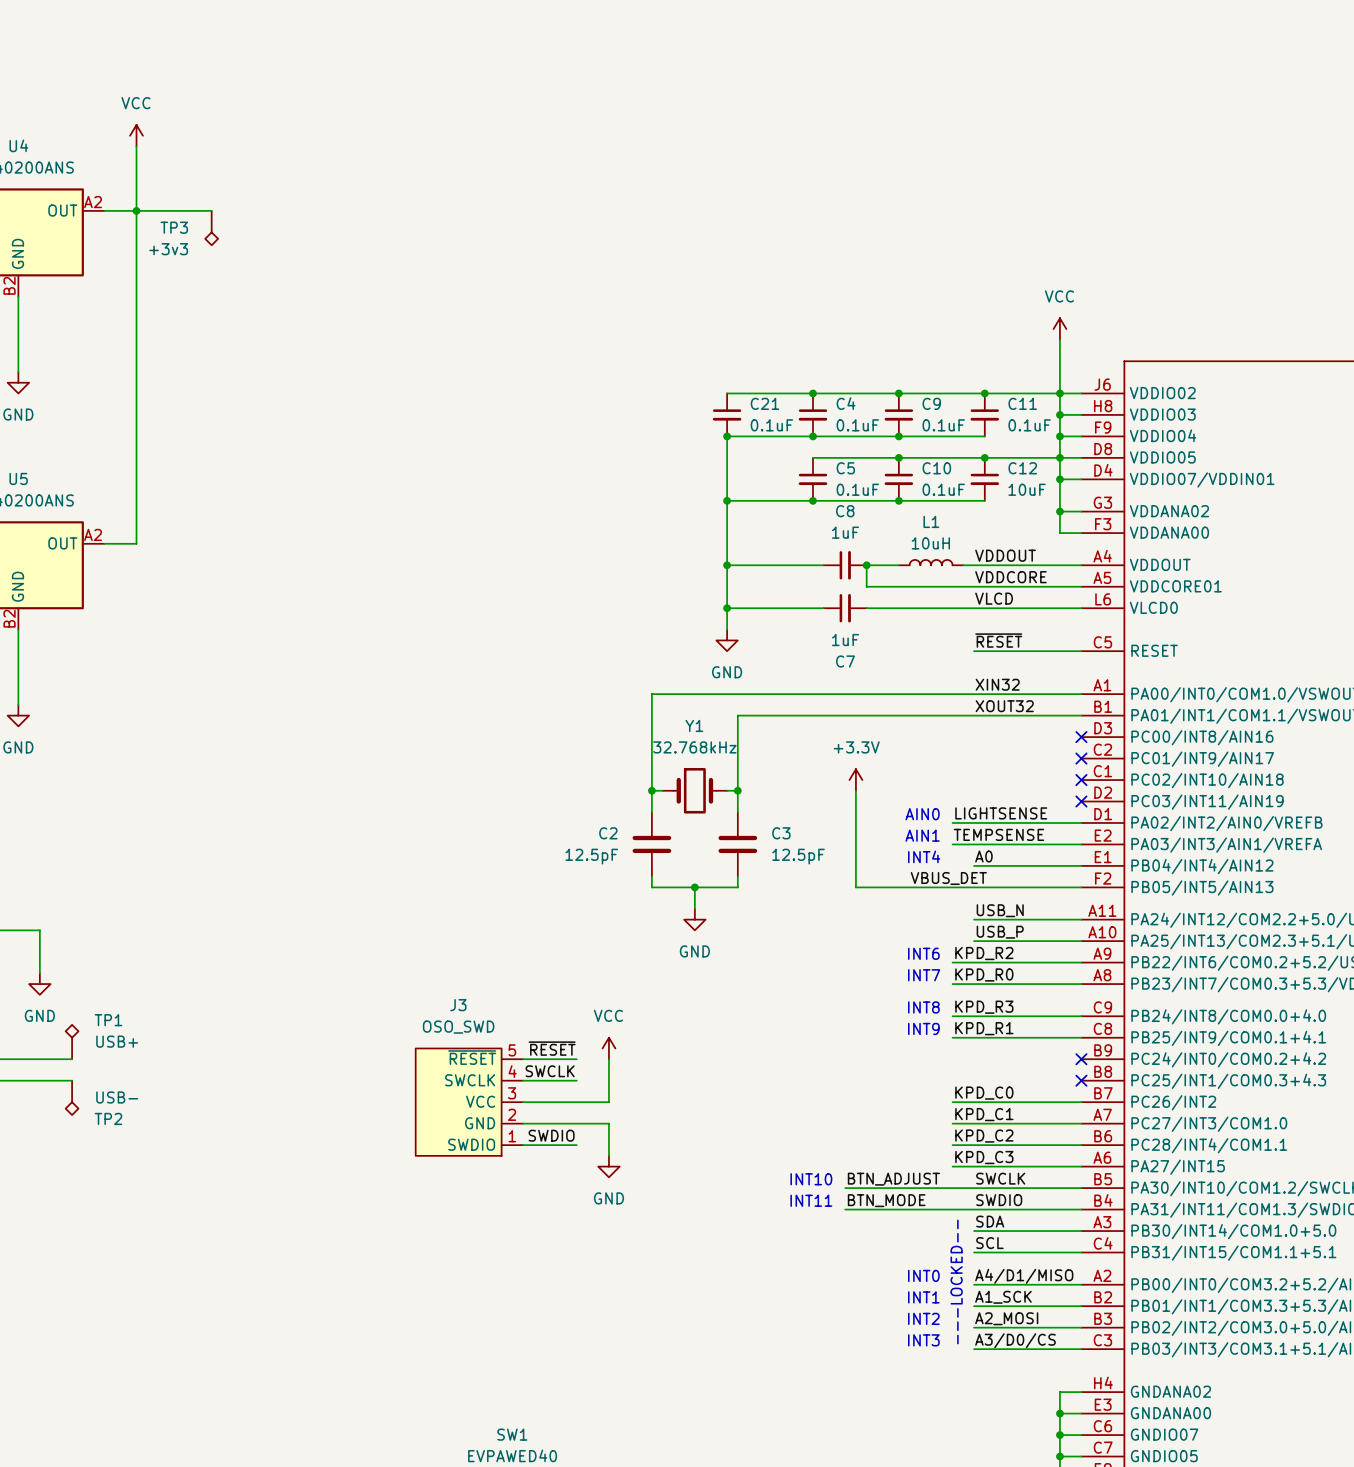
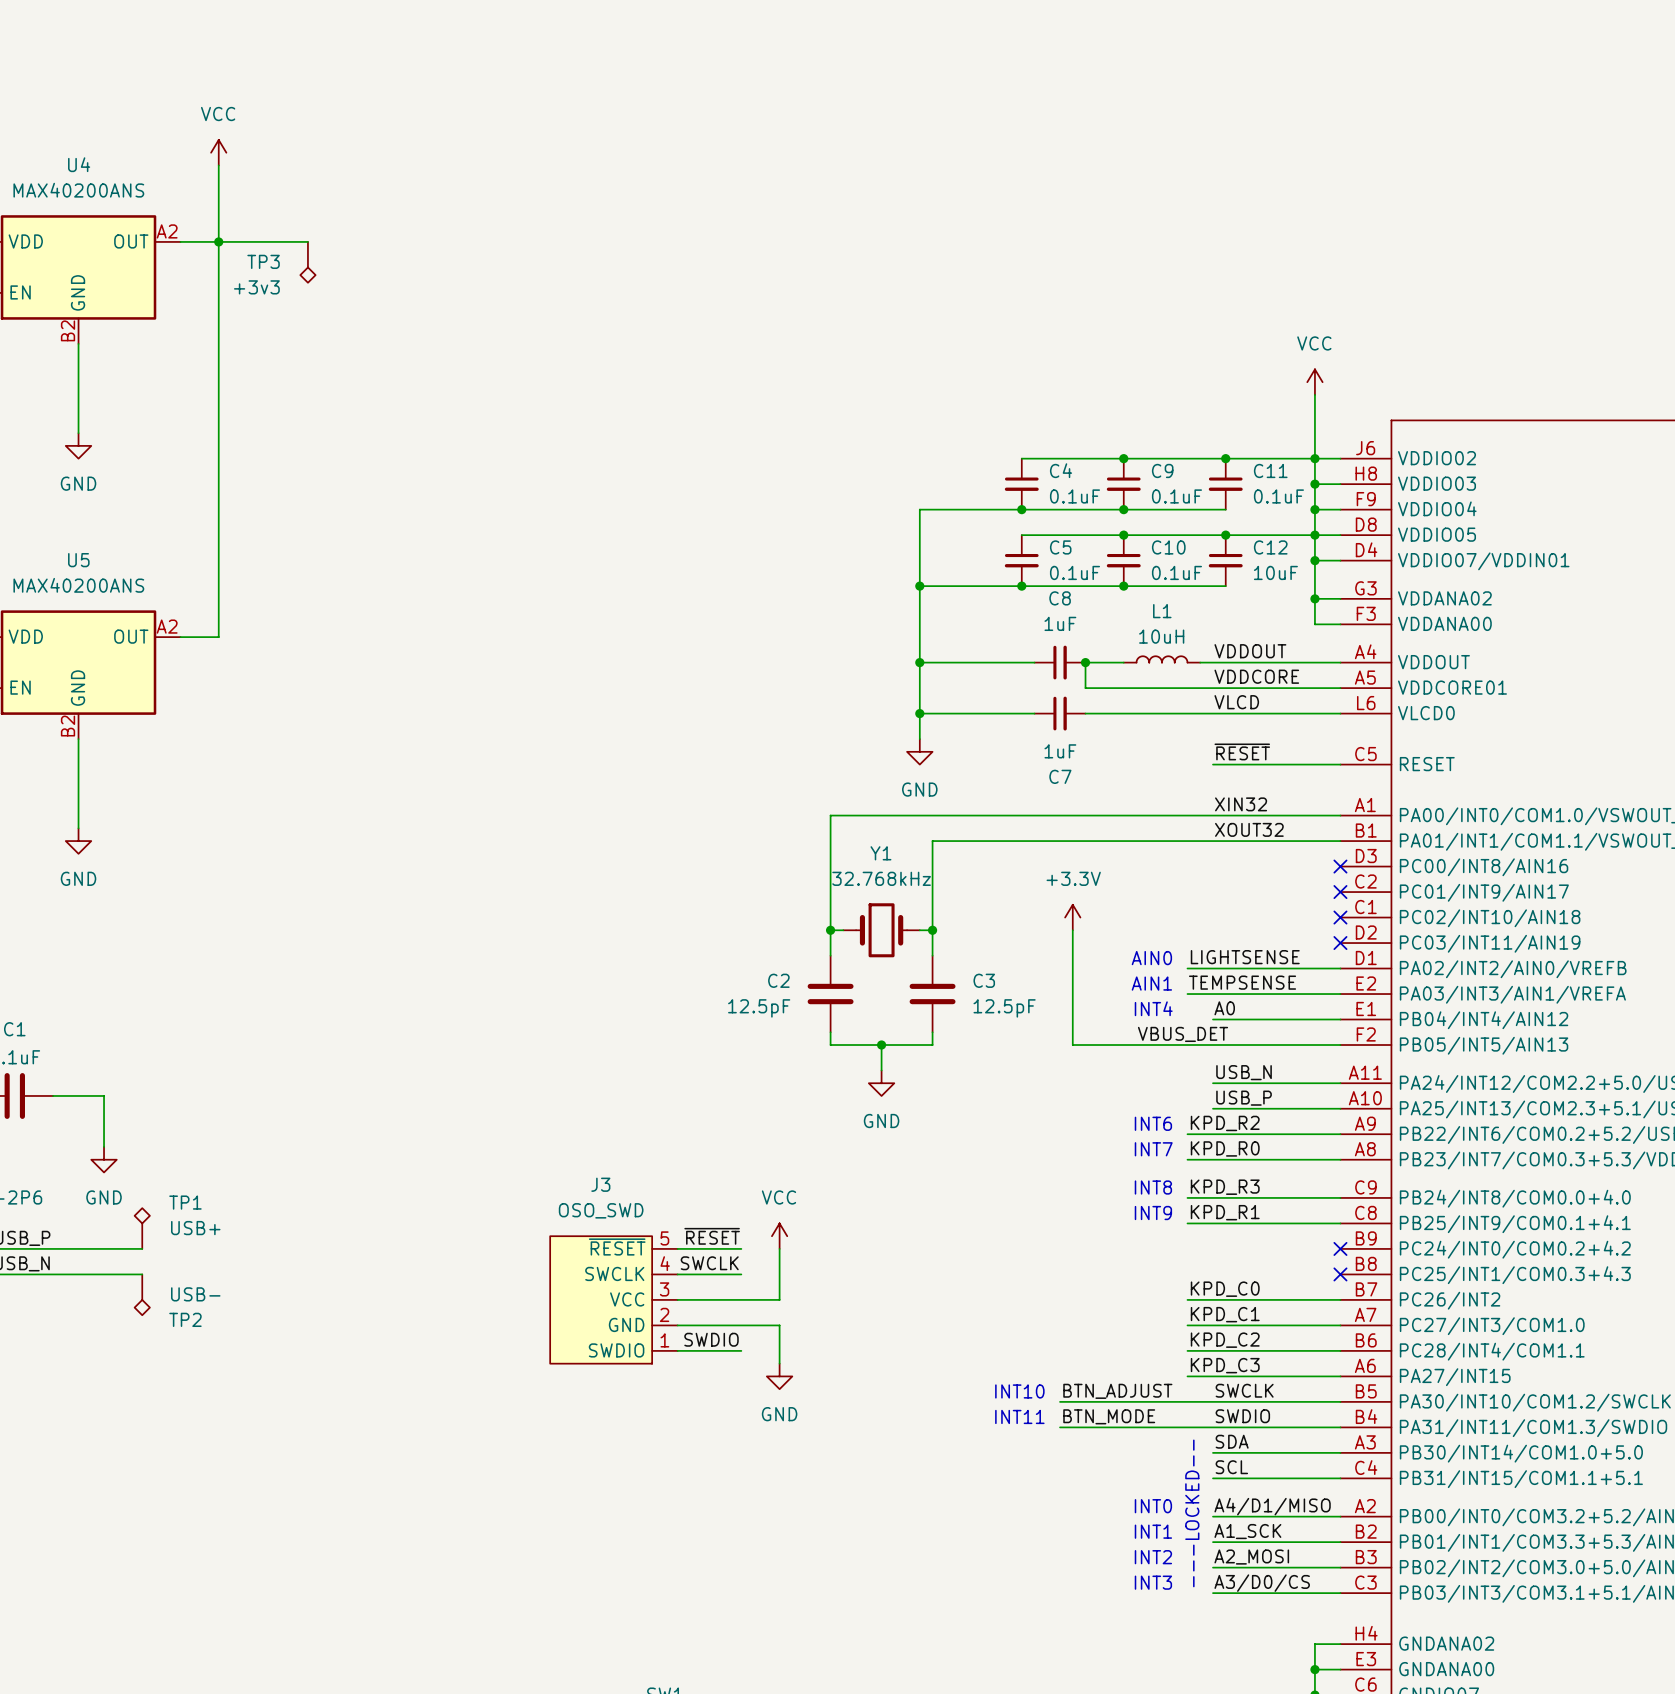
wire: (727, 393) (812, 393) -> none
junction: (812, 393) -> none
C21: 0.1uF (727, 414) -> none
junction: (727, 436) -> none

